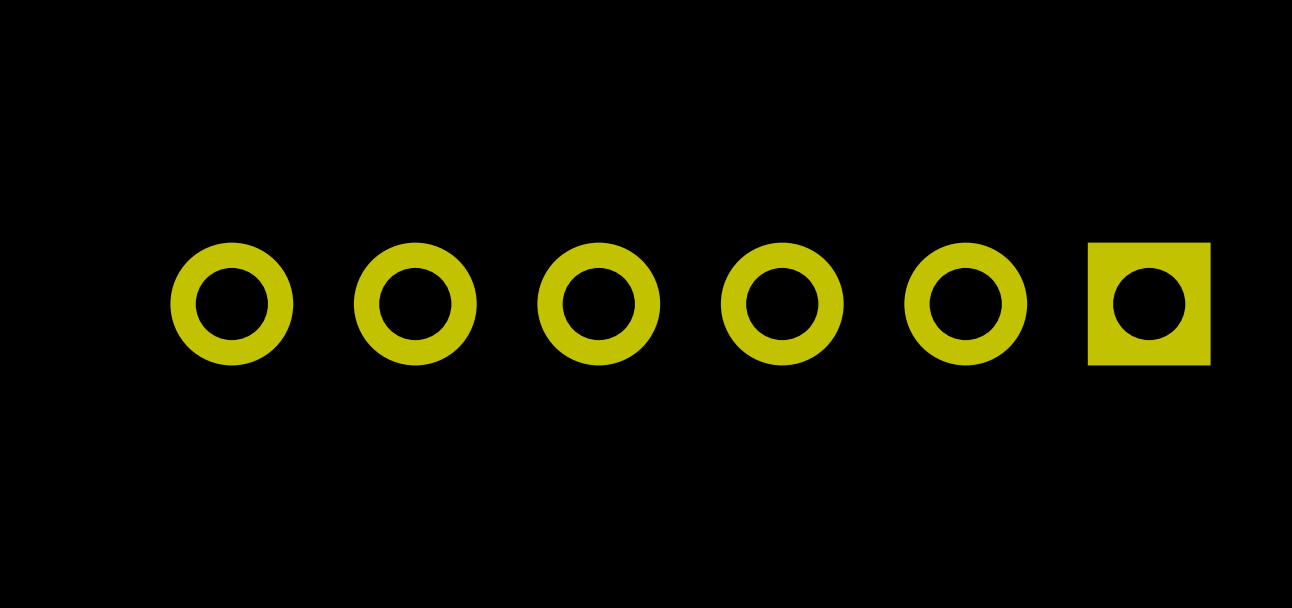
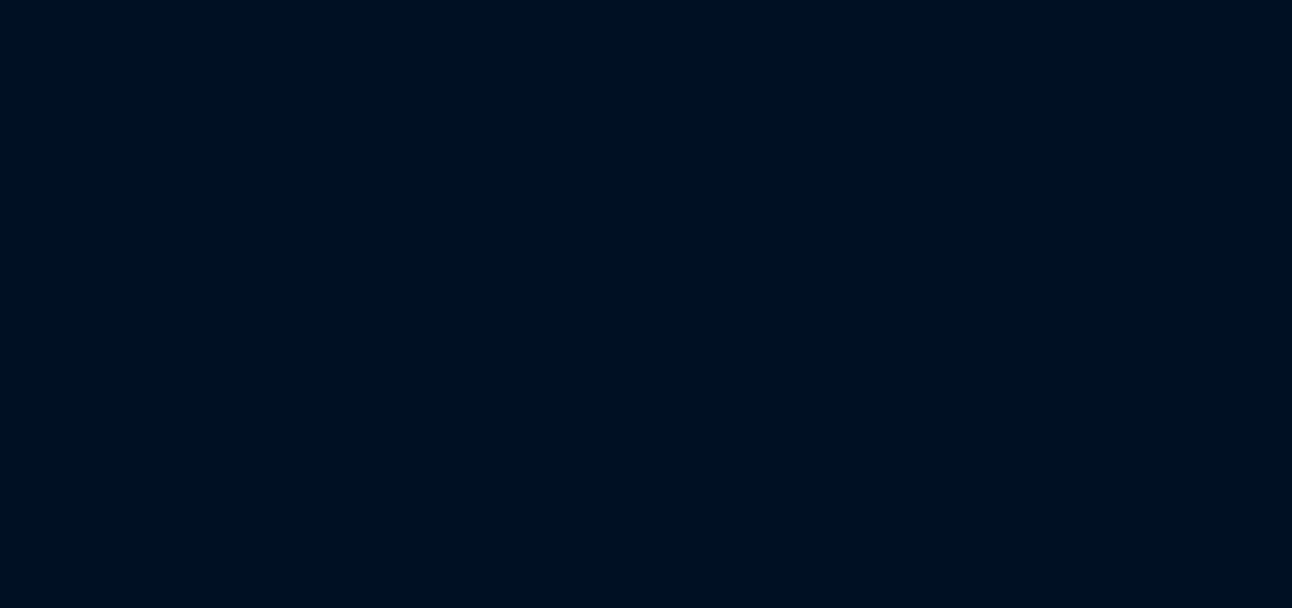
part: (690, 304) -> none

